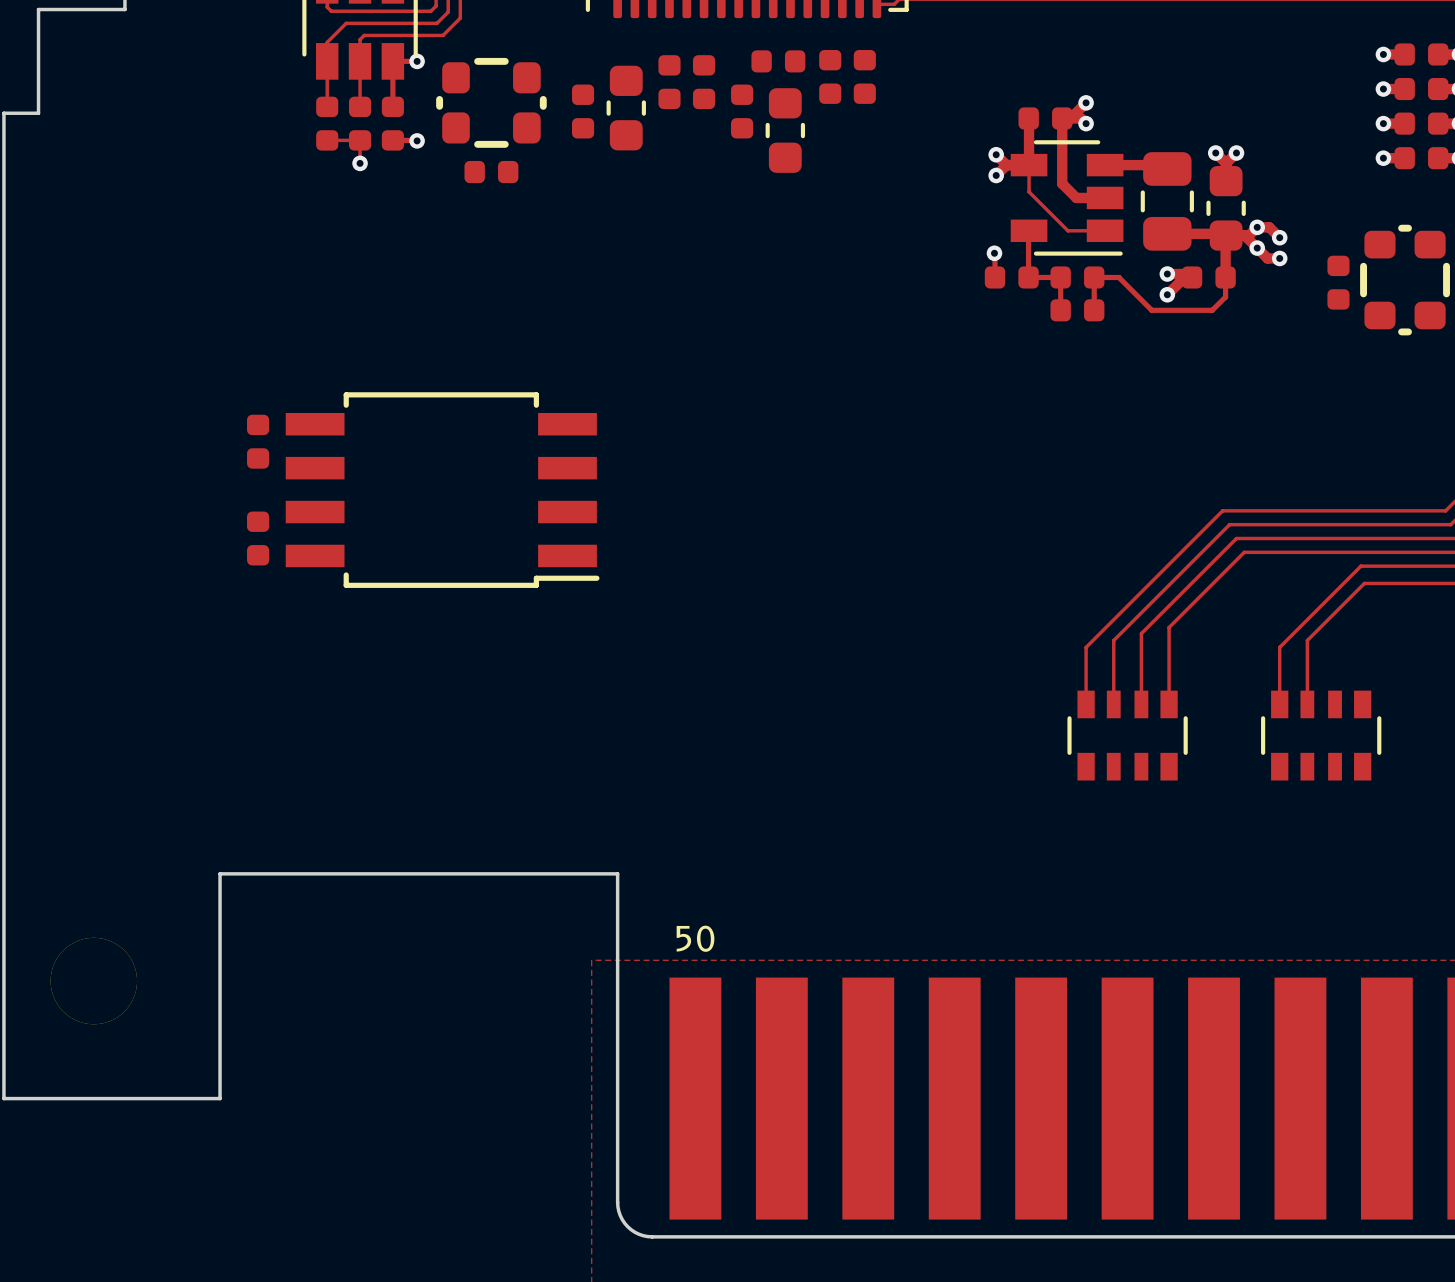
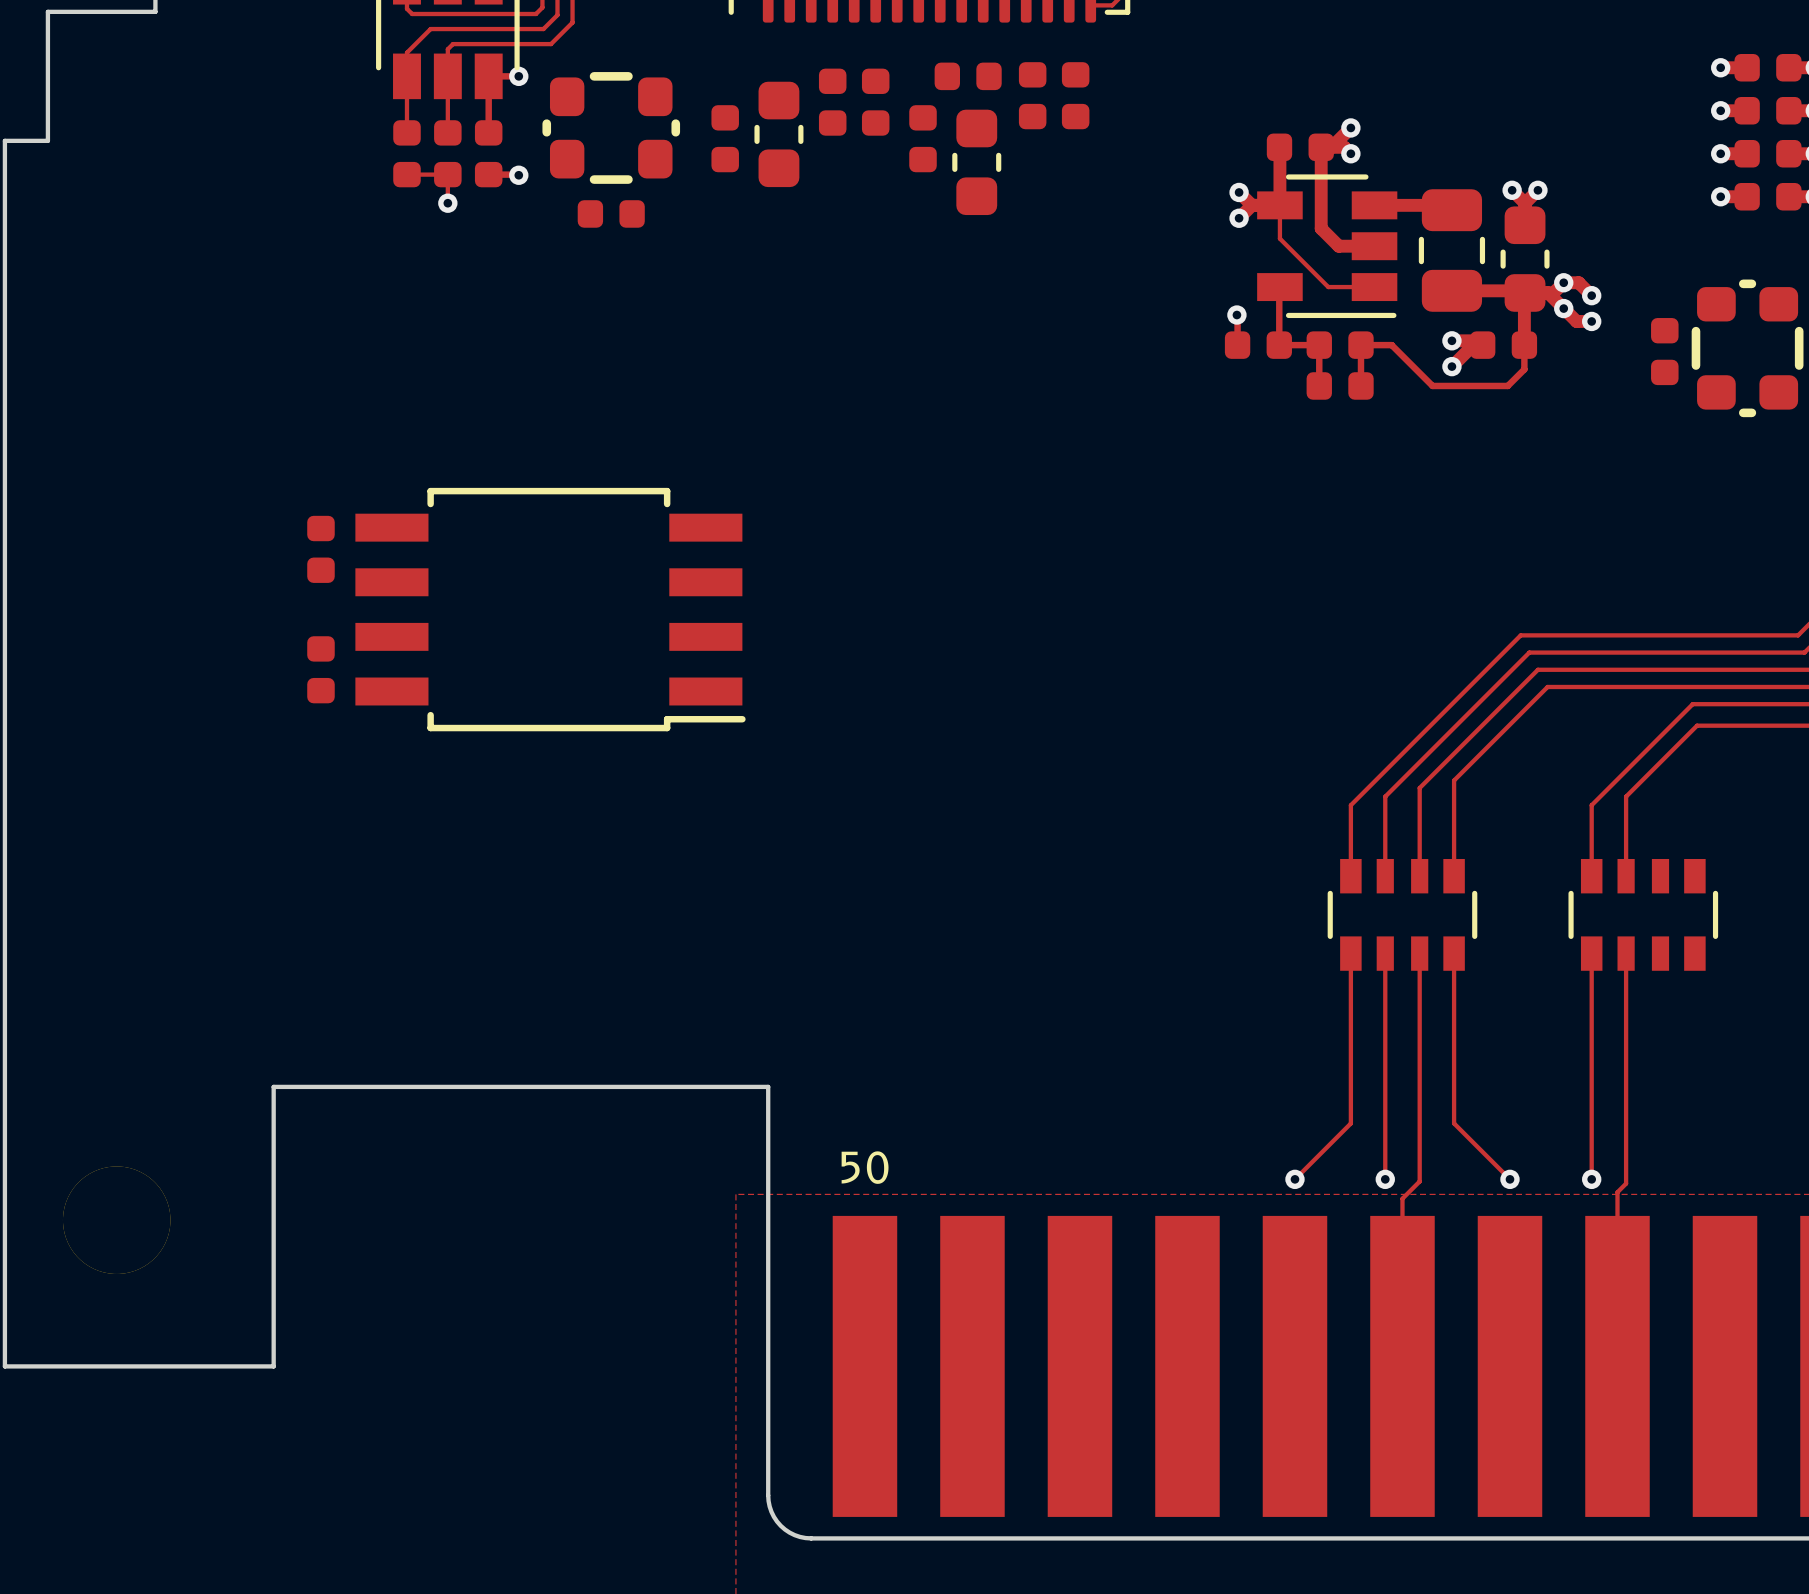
track: none -> (1350, 953) (1350, 1123) (1294, 1179)
track: none -> (1385, 953) (1385, 1179)
track: none -> (1419, 953) (1419, 1181) (1402, 1198) (1402, 1366)
track: none -> (1454, 953) (1454, 1123) (1509, 1179)
track: none -> (1591, 953) (1591, 1179)
track: none -> (1626, 953) (1626, 1183) (1617, 1192) (1617, 1366)
via: none -> (1294, 1179)
via: none -> (1385, 1179)
via: none -> (1509, 1179)
via: none -> (1591, 1179)

